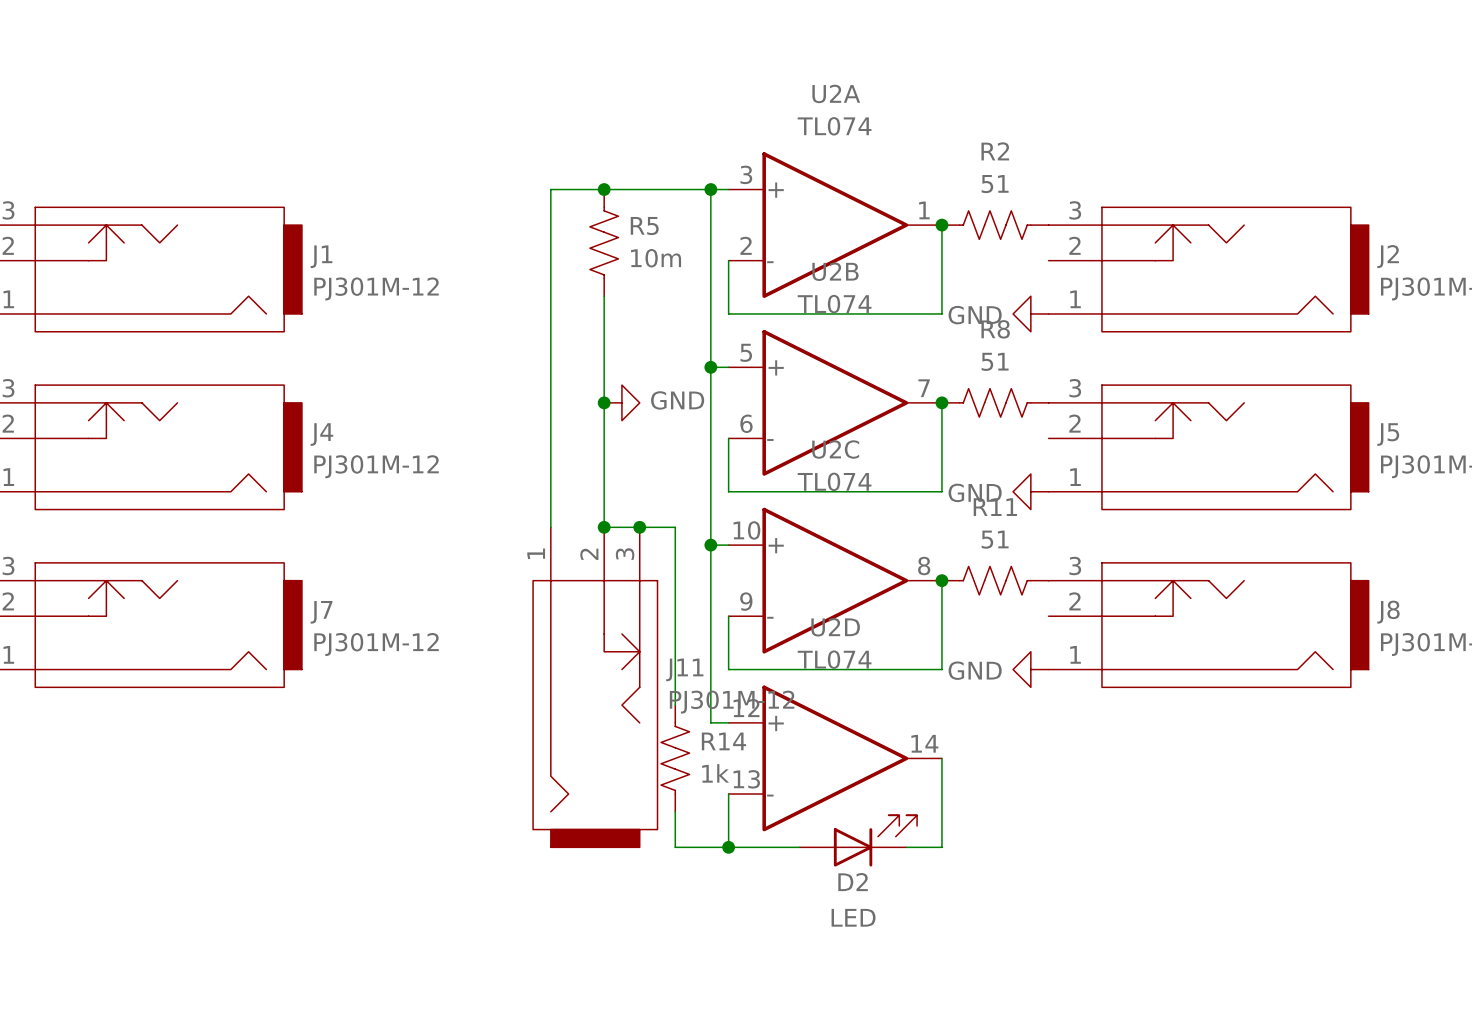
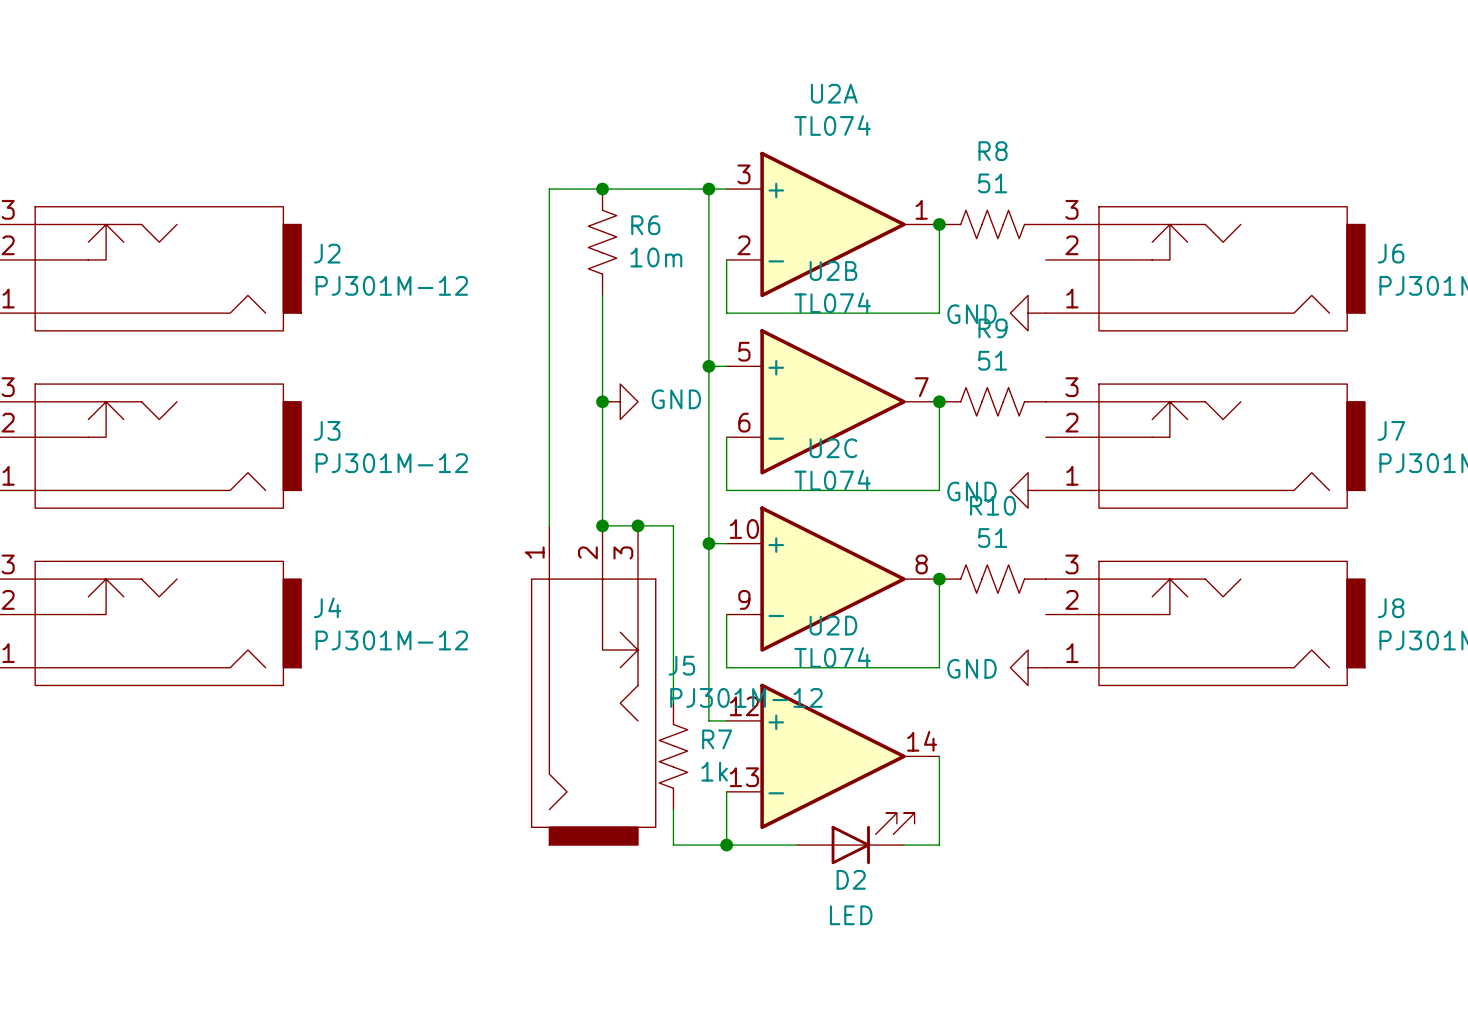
R2 name: R2 (995, 151) -> R8 (993, 151)
R5 name: R5 (644, 226) -> R6 (645, 225)
J1 name: J1 (321, 256) -> J2 (327, 253)
J2 name: J2 (1388, 256) -> J6 (1391, 253)
R8 name: R8 (995, 329) -> R9 (993, 328)
J4 name: J4 (321, 434) -> J3 (327, 430)
J5 name: J5 (1388, 434) -> J7 (1391, 430)
R11 name: R11 (995, 507) -> R10 (993, 505)
J7 name: J7 (321, 612) -> J4 (327, 607)
J11 name: J11 (684, 669) -> J5 (681, 665)
R14 name: R14 (723, 741) -> R7 (717, 739)

